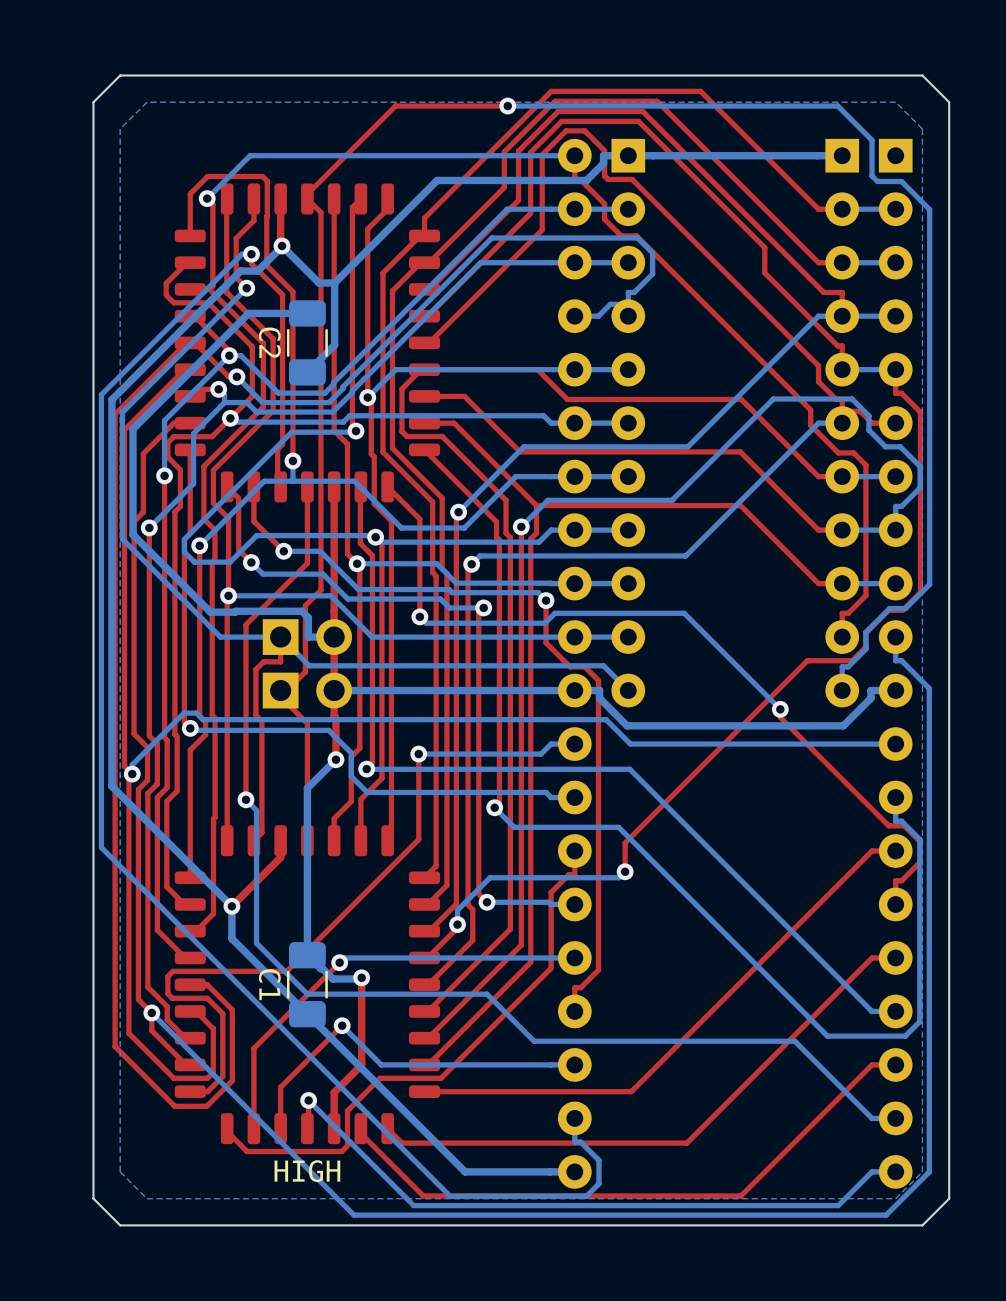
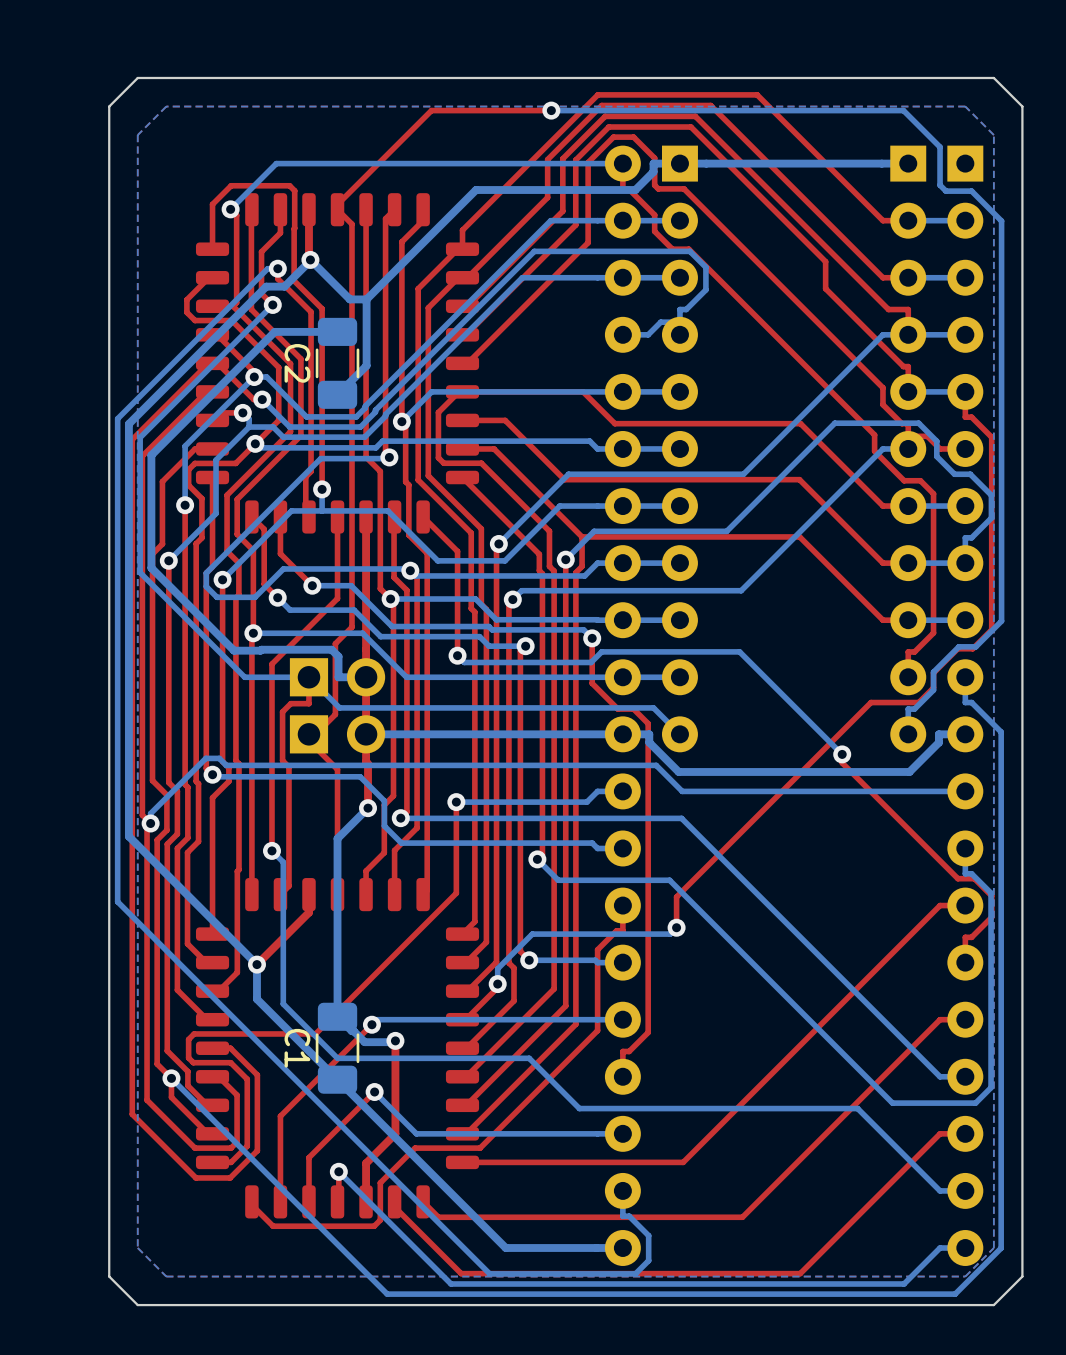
text: HIGH (307, 1171) -> none

